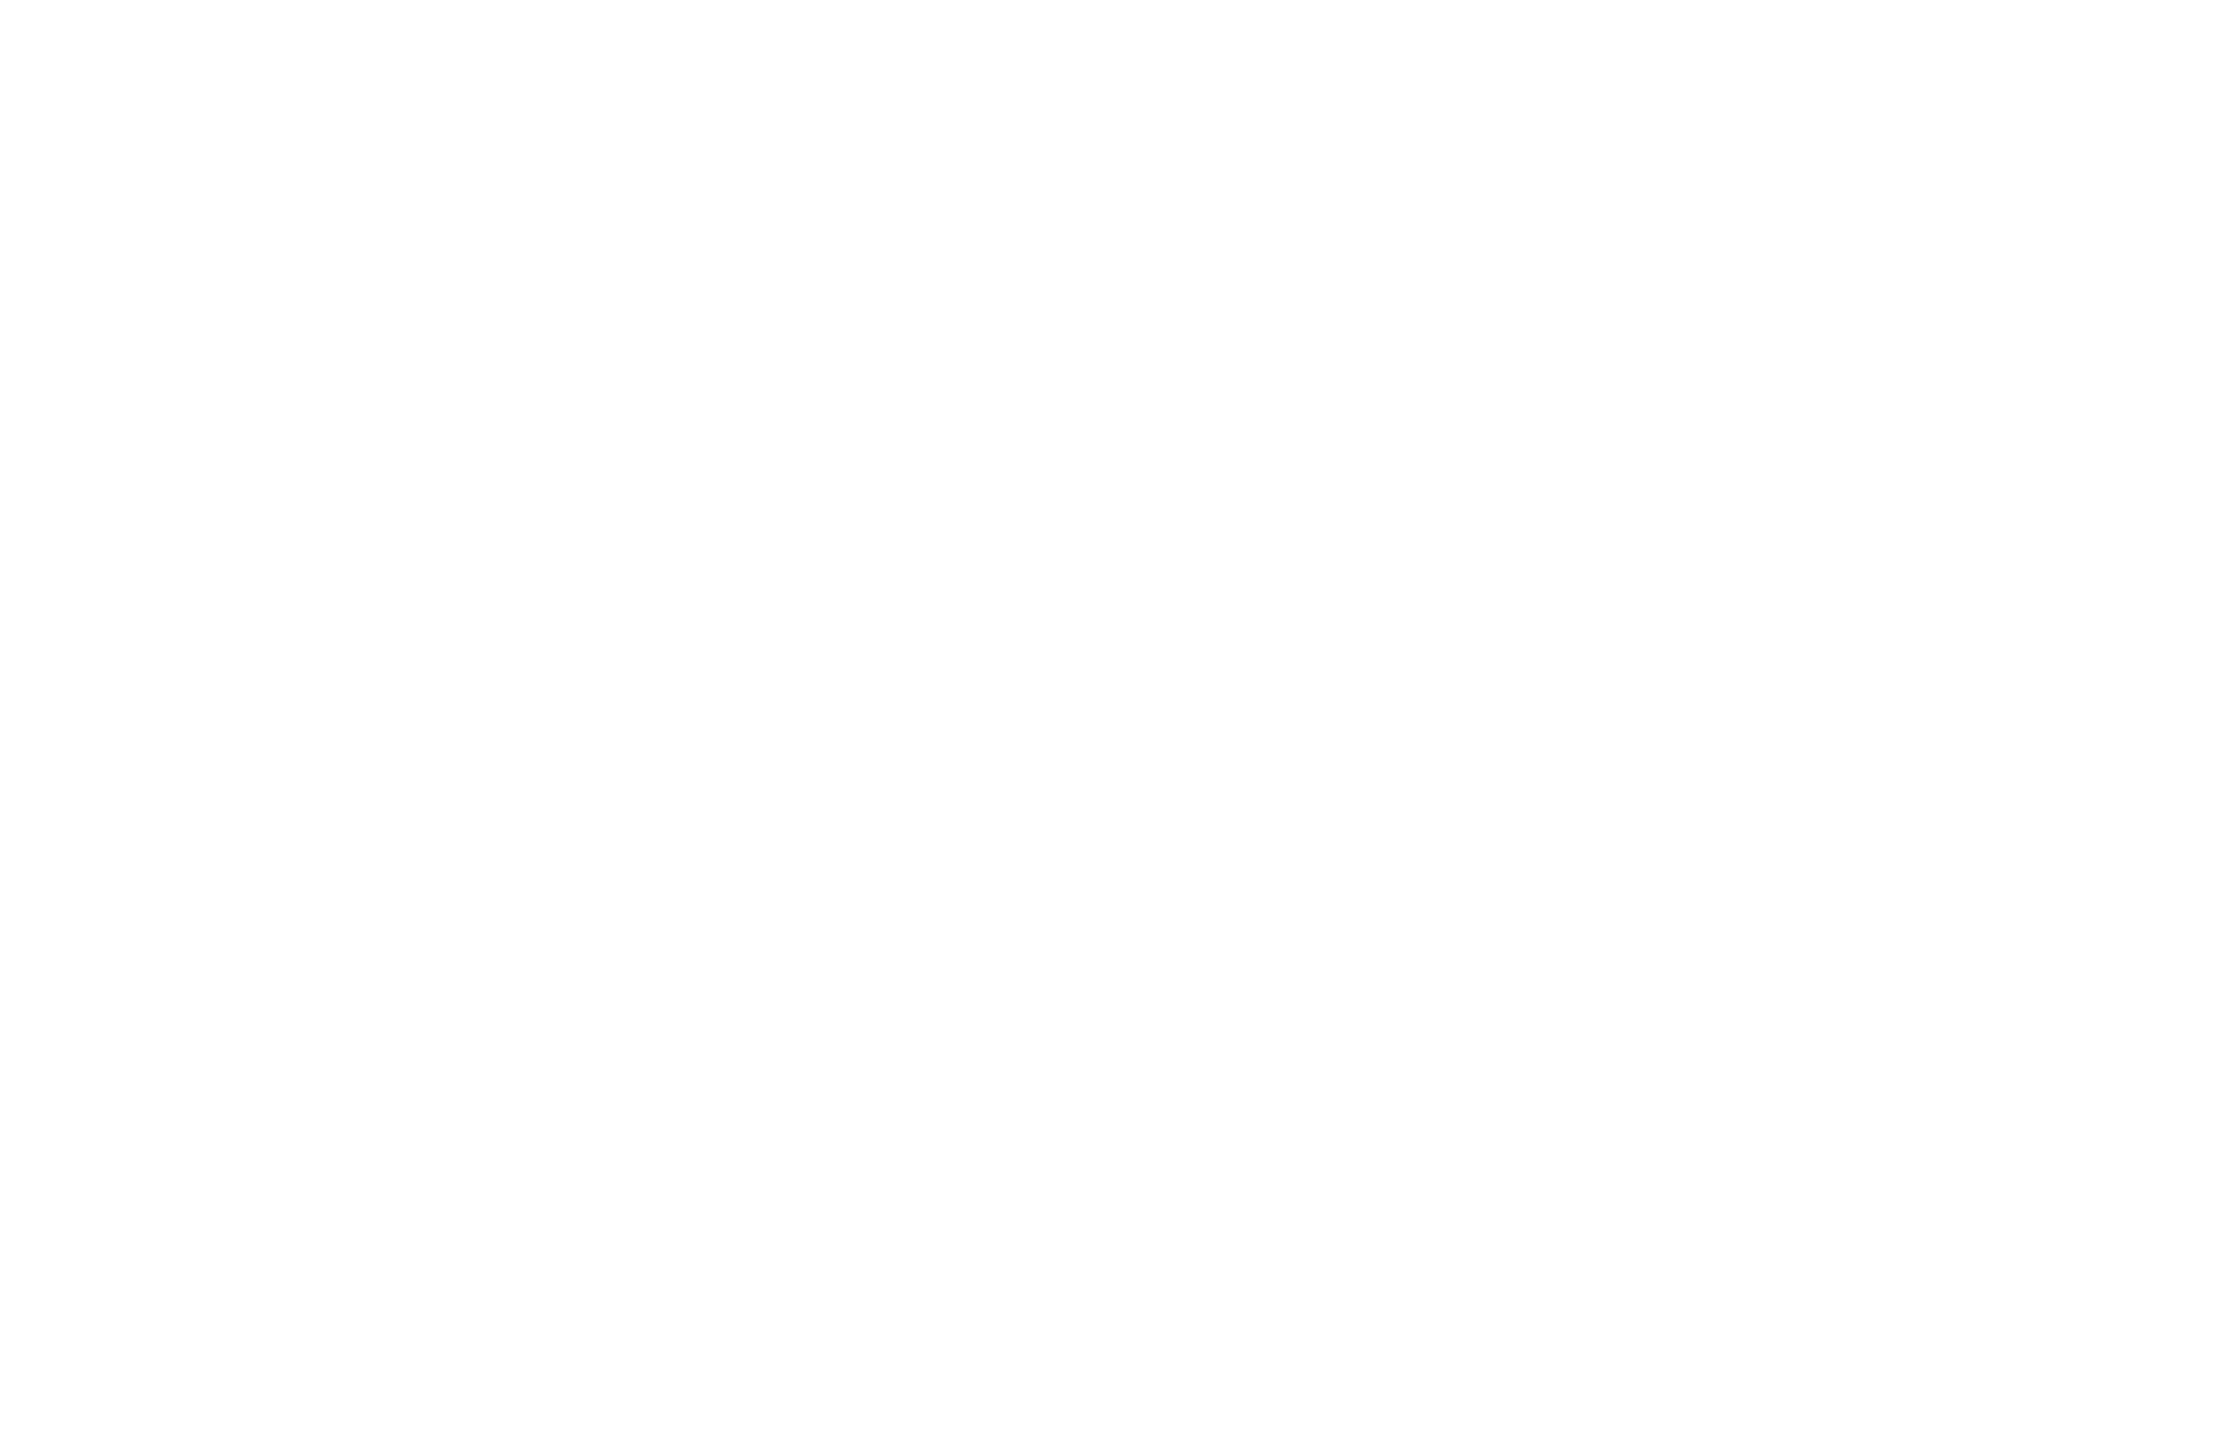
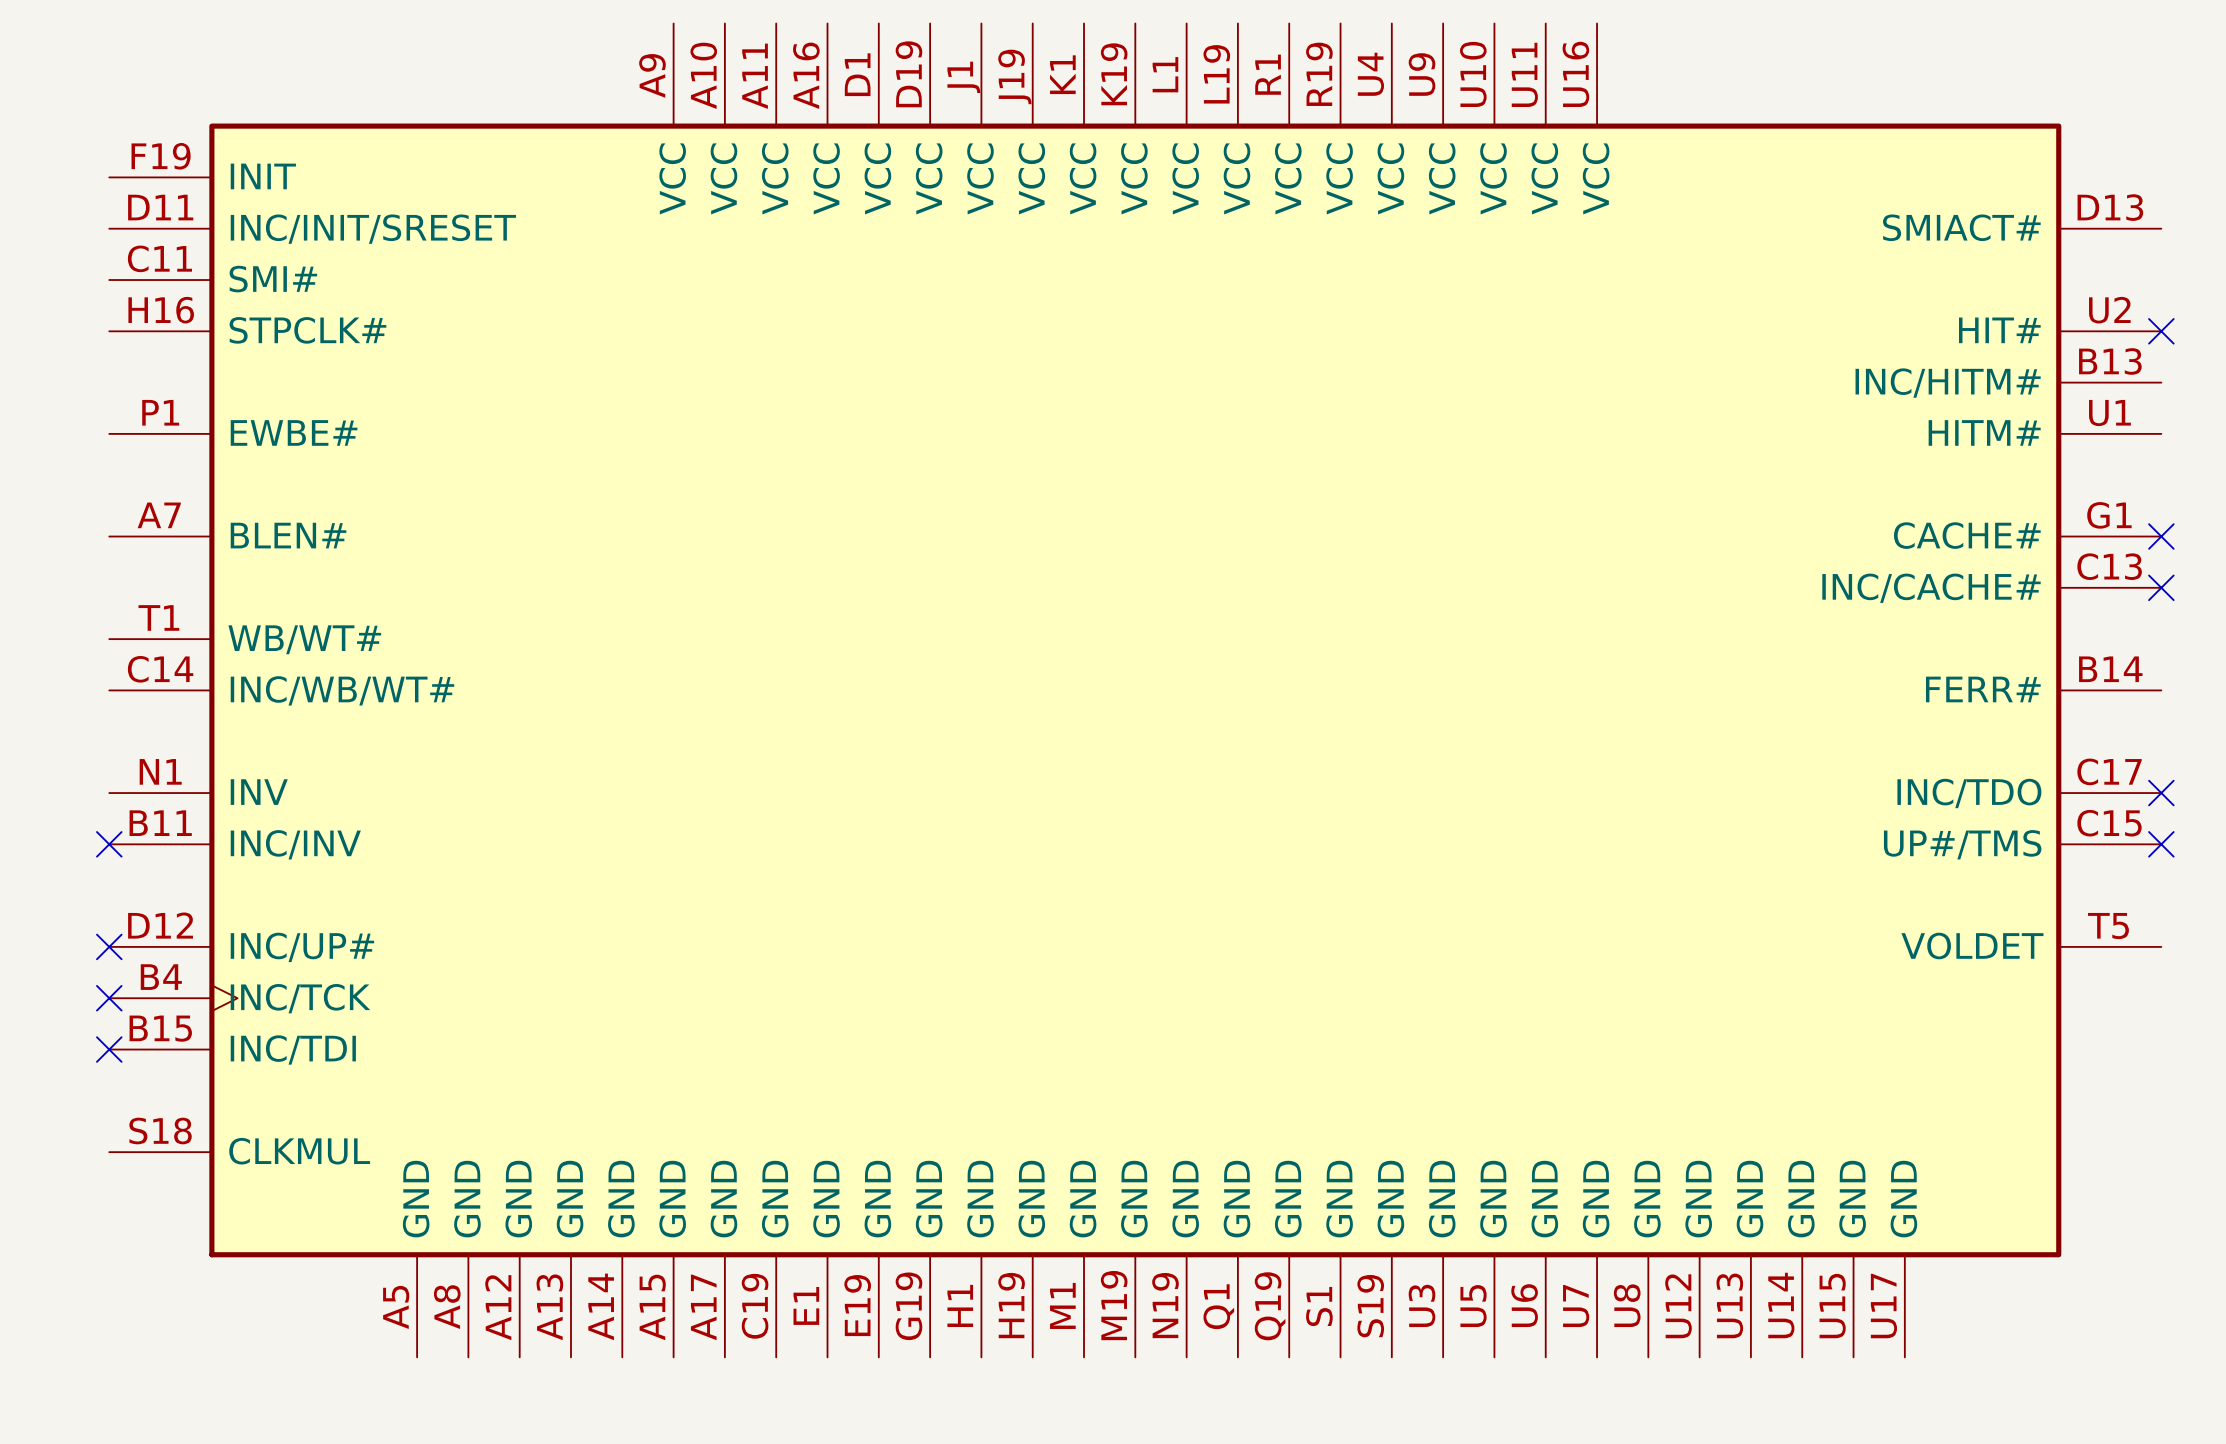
no-connect mark: none -> (2161, 331)
no-connect mark: none -> (2161, 536)
no-connect mark: none -> (2161, 587)
part: none -> (1135, 690)
no-connect mark: none -> (2161, 793)
no-connect mark: none -> (109, 844)
no-connect mark: none -> (2161, 844)
no-connect mark: none -> (109, 946)
no-connect mark: none -> (109, 998)
no-connect mark: none -> (109, 1049)

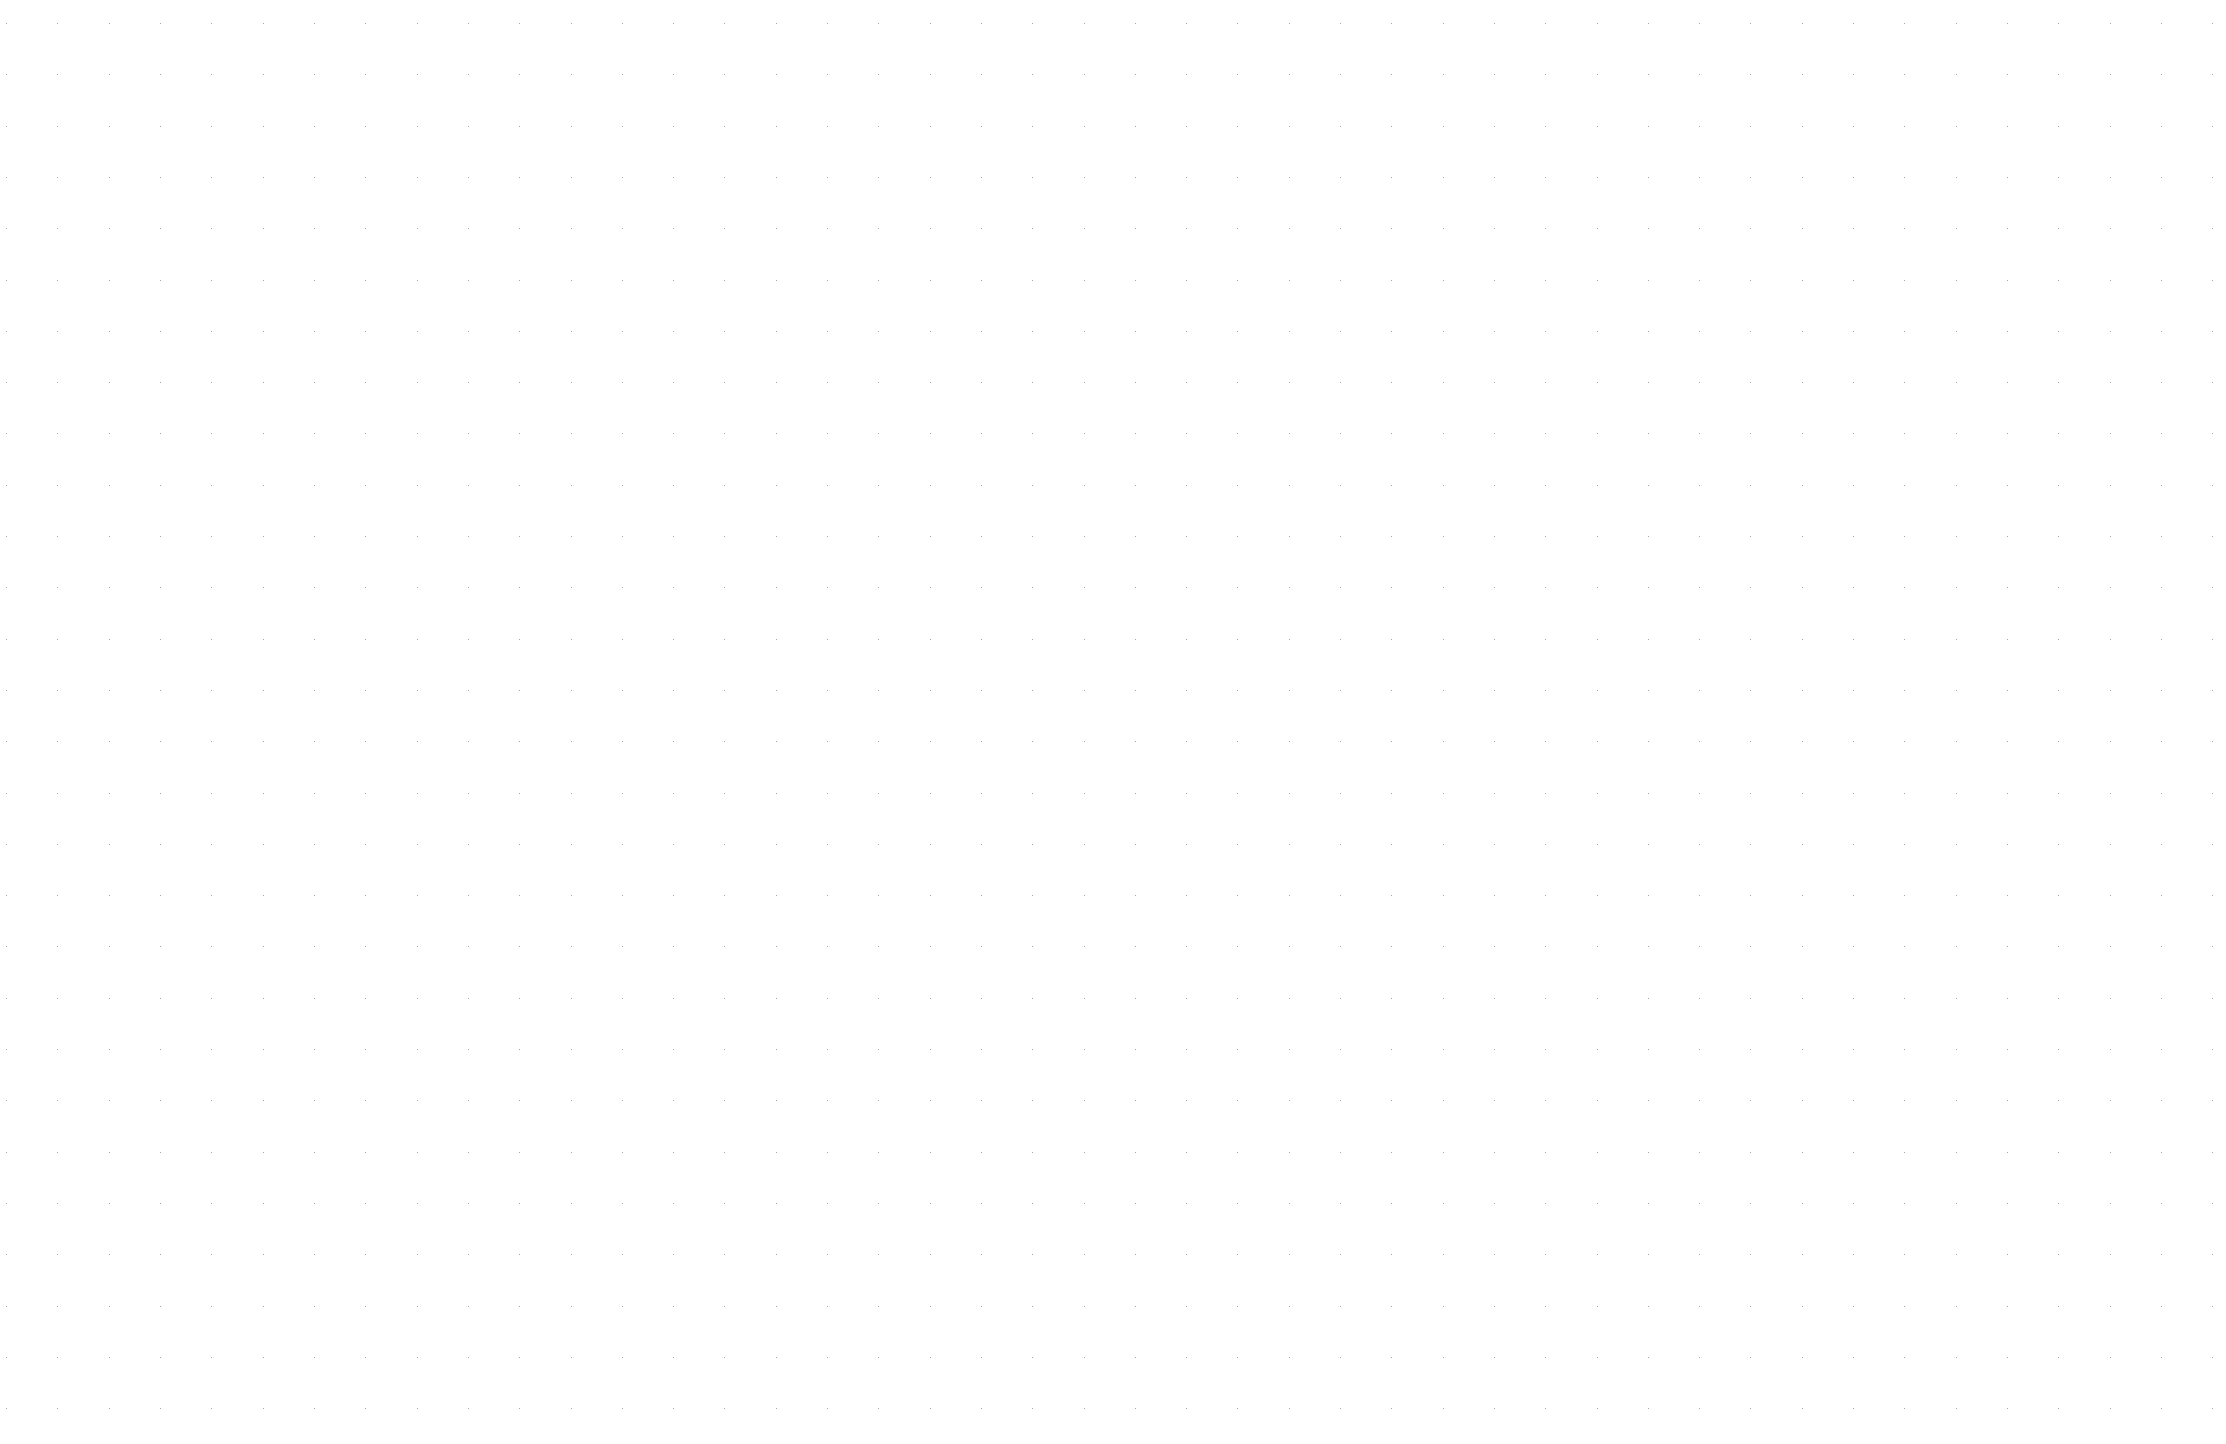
no-connect mark: (2161, 331) -> none
no-connect mark: (2161, 536) -> none
no-connect mark: (2161, 587) -> none
part: (1135, 690) -> none
no-connect mark: (2161, 793) -> none
no-connect mark: (109, 844) -> none
no-connect mark: (2161, 844) -> none
no-connect mark: (109, 946) -> none
no-connect mark: (109, 998) -> none
no-connect mark: (109, 1049) -> none

